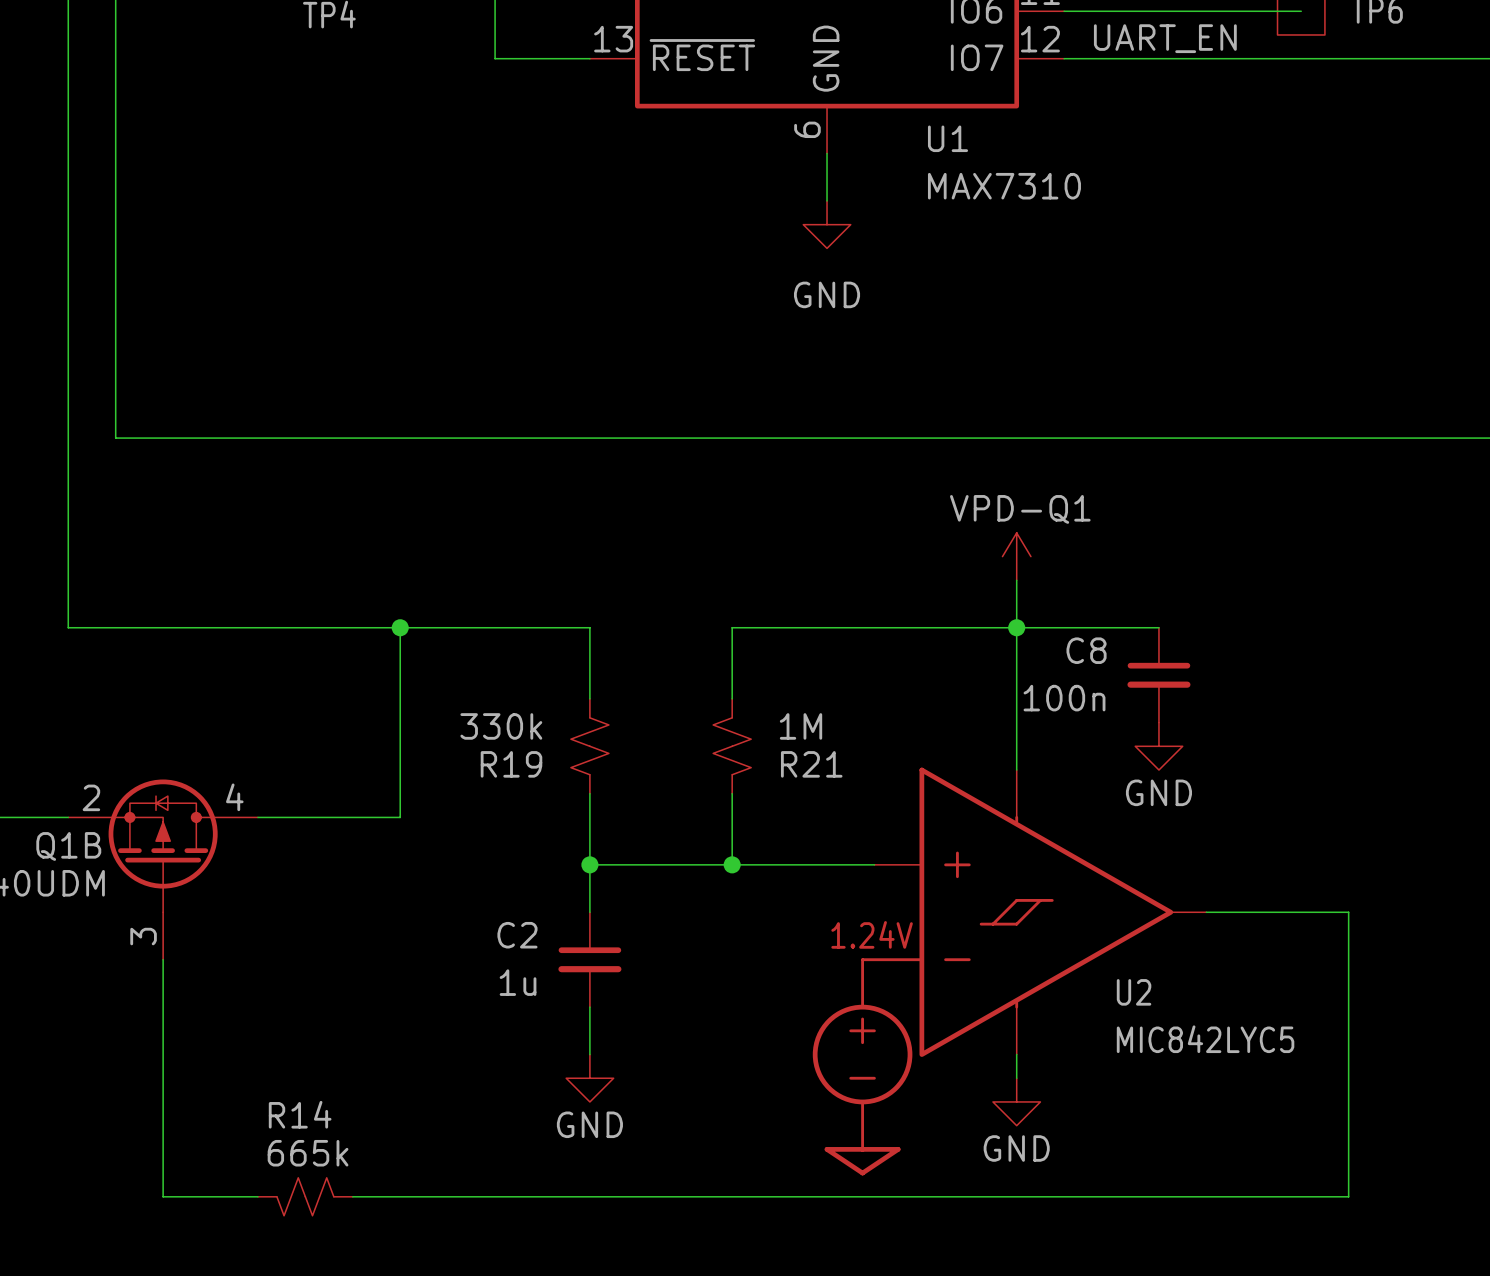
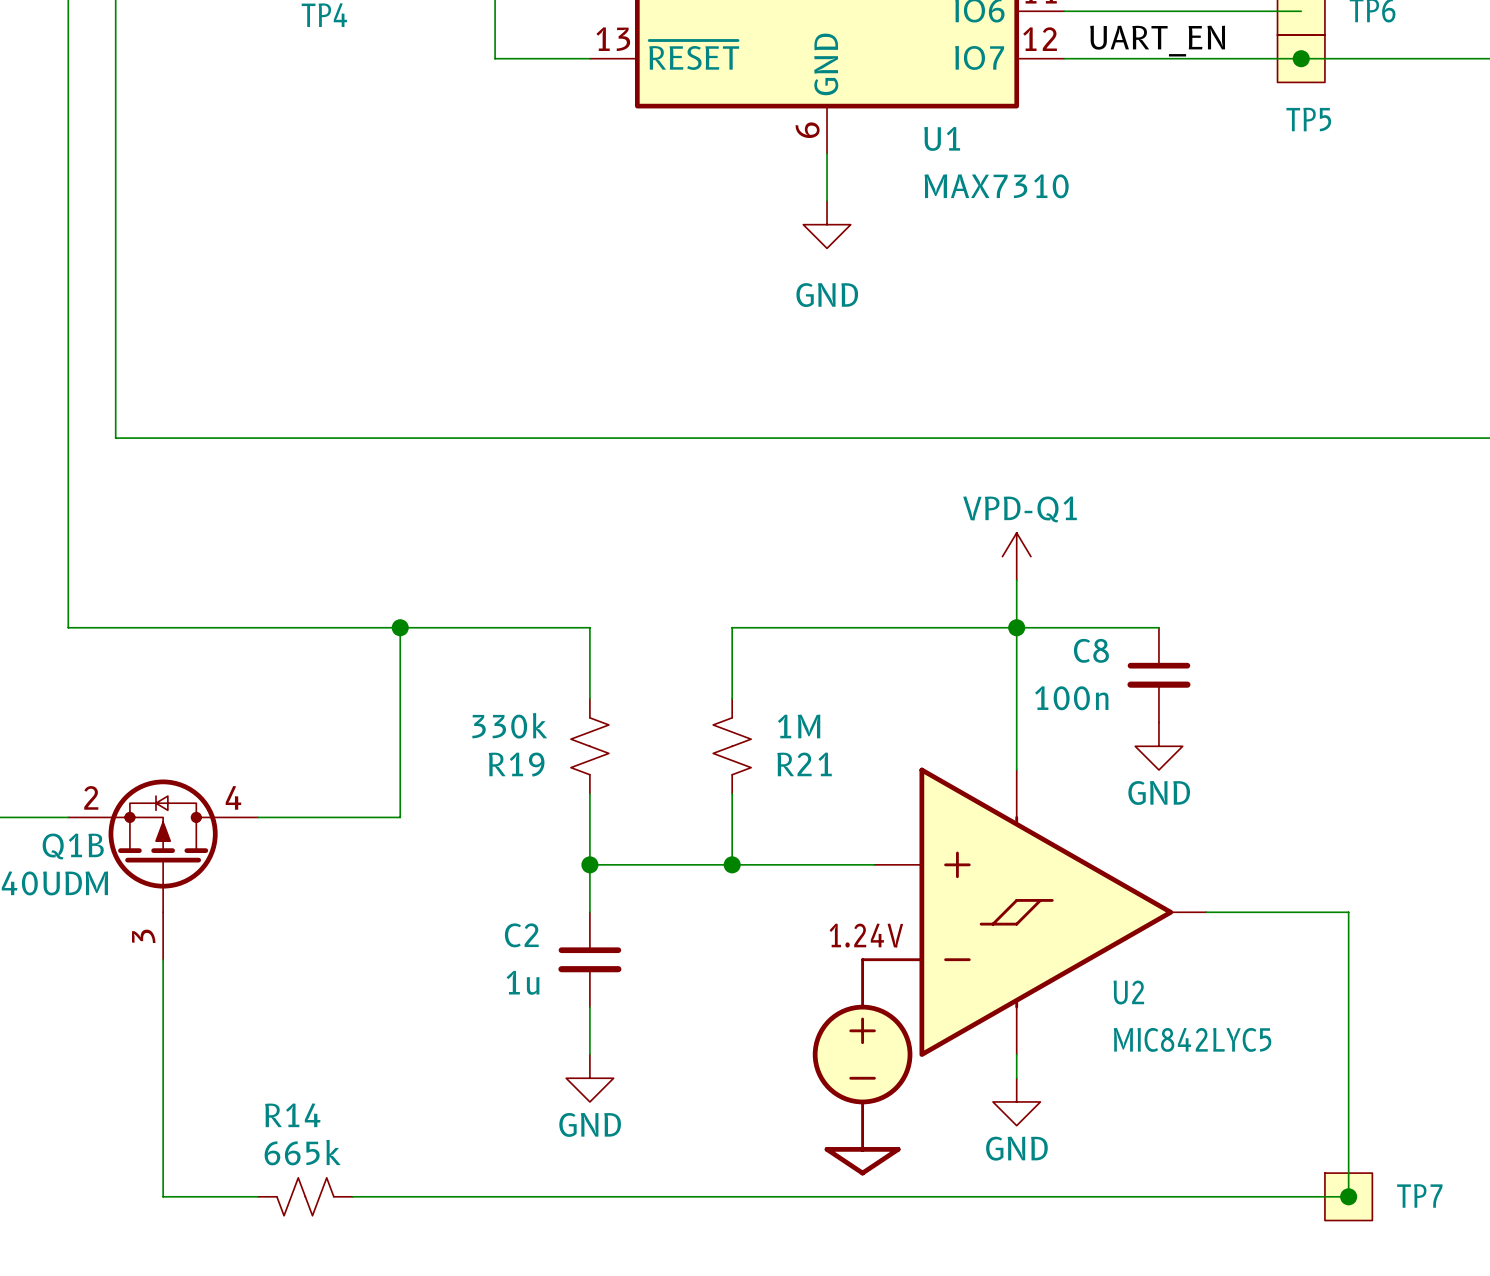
junction: none -> (1301, 58)
TP5: none -> (1301, 58)
junction: none -> (1348, 1196)
TP7: none -> (1348, 1196)

